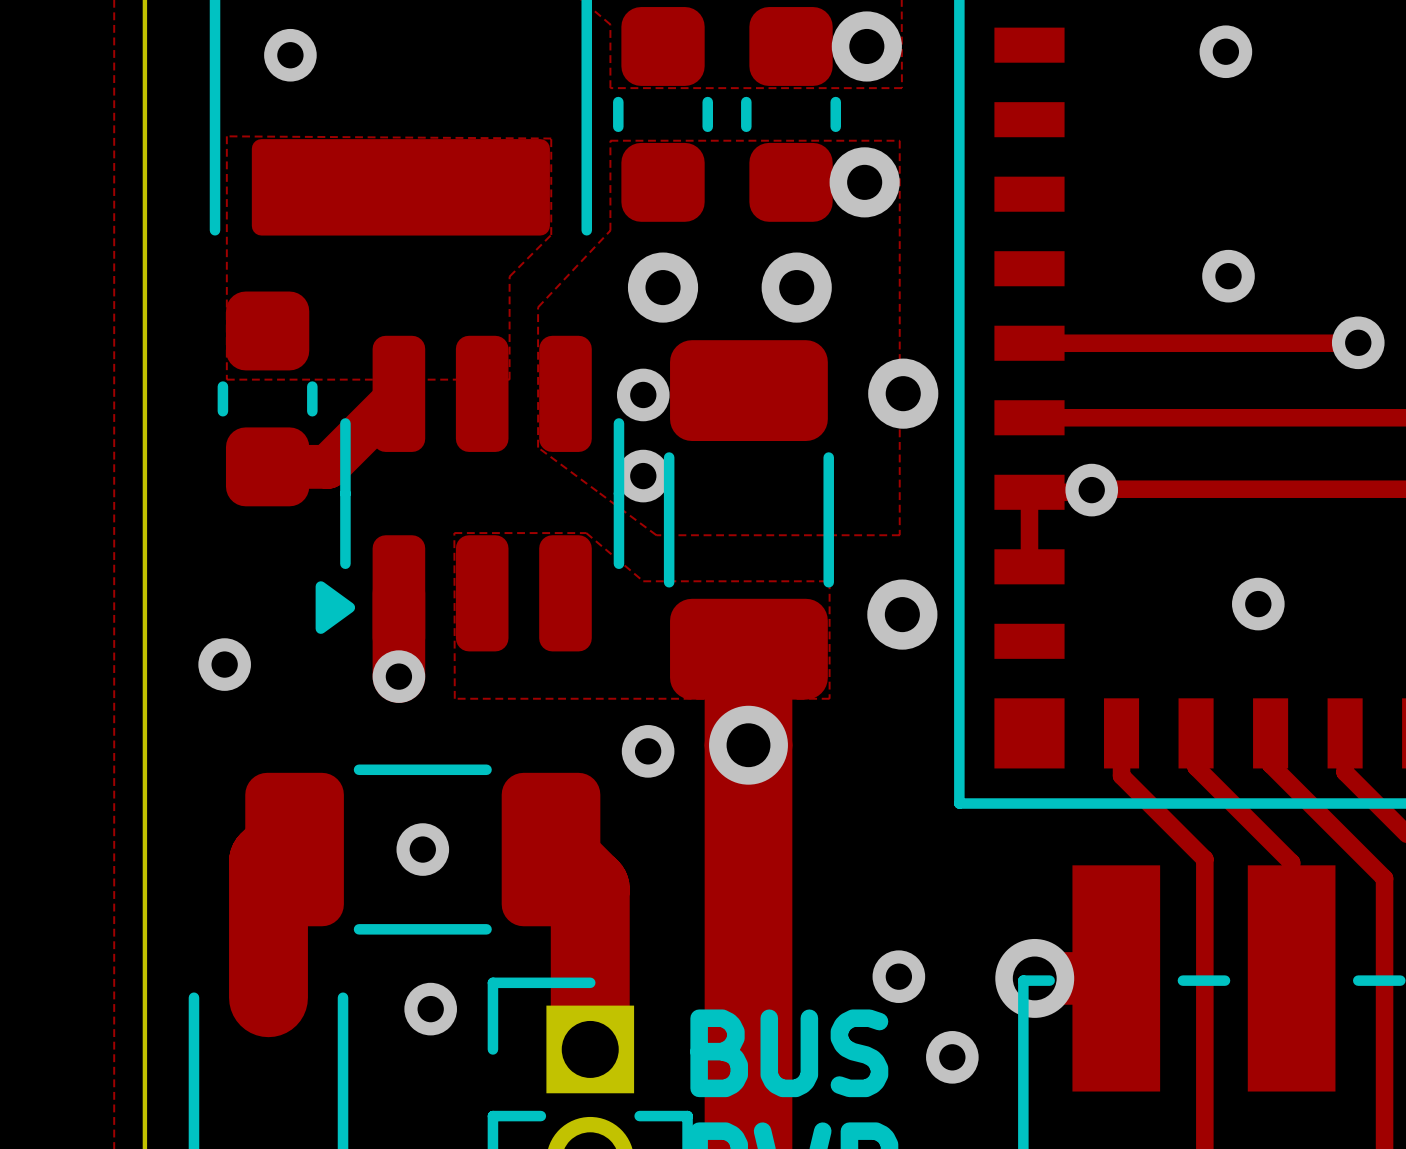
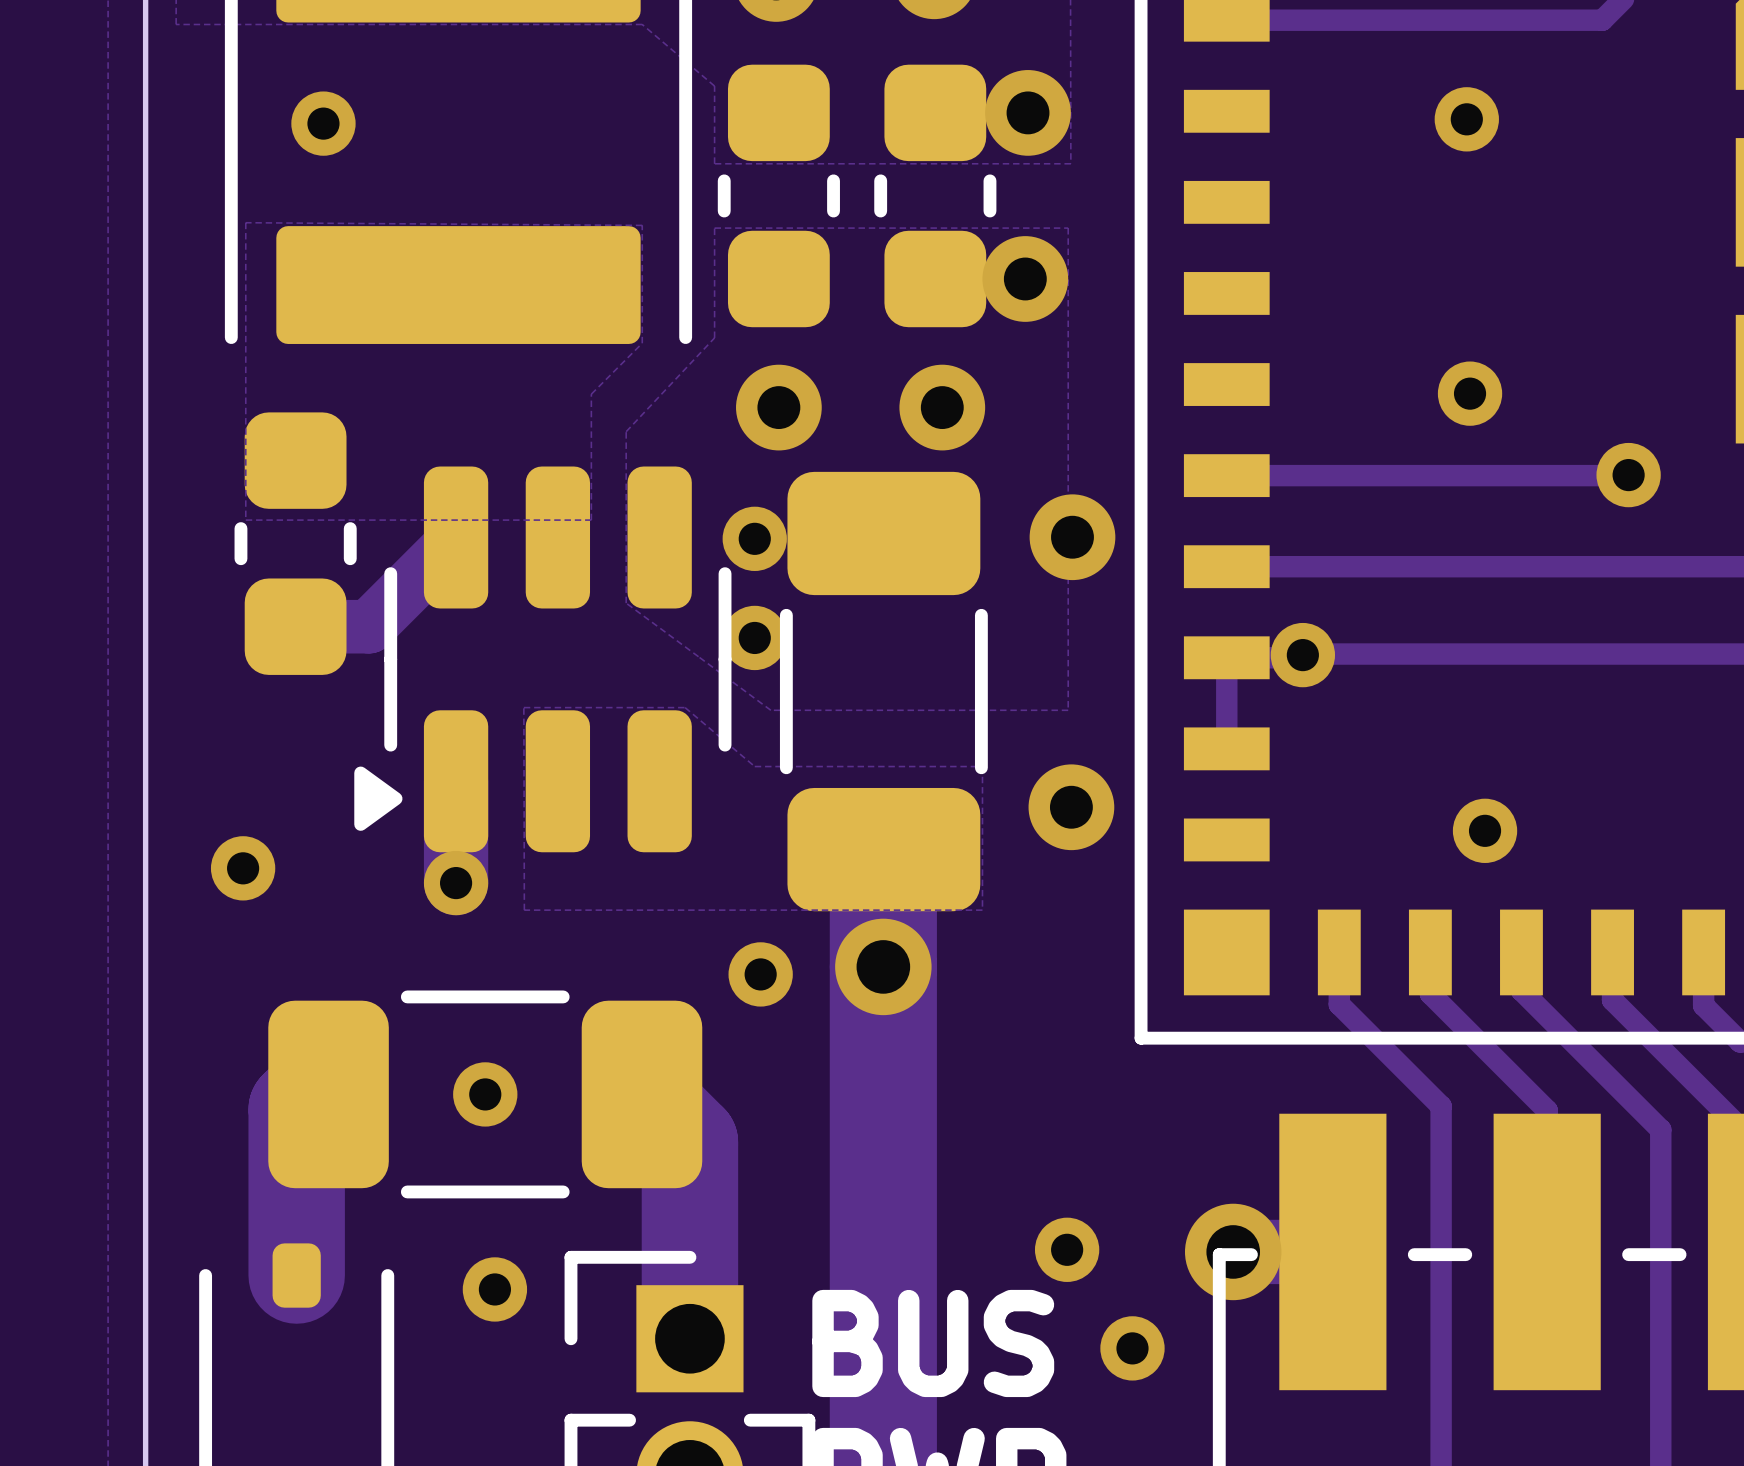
via position: (1258, 604) -> (1485, 830)

